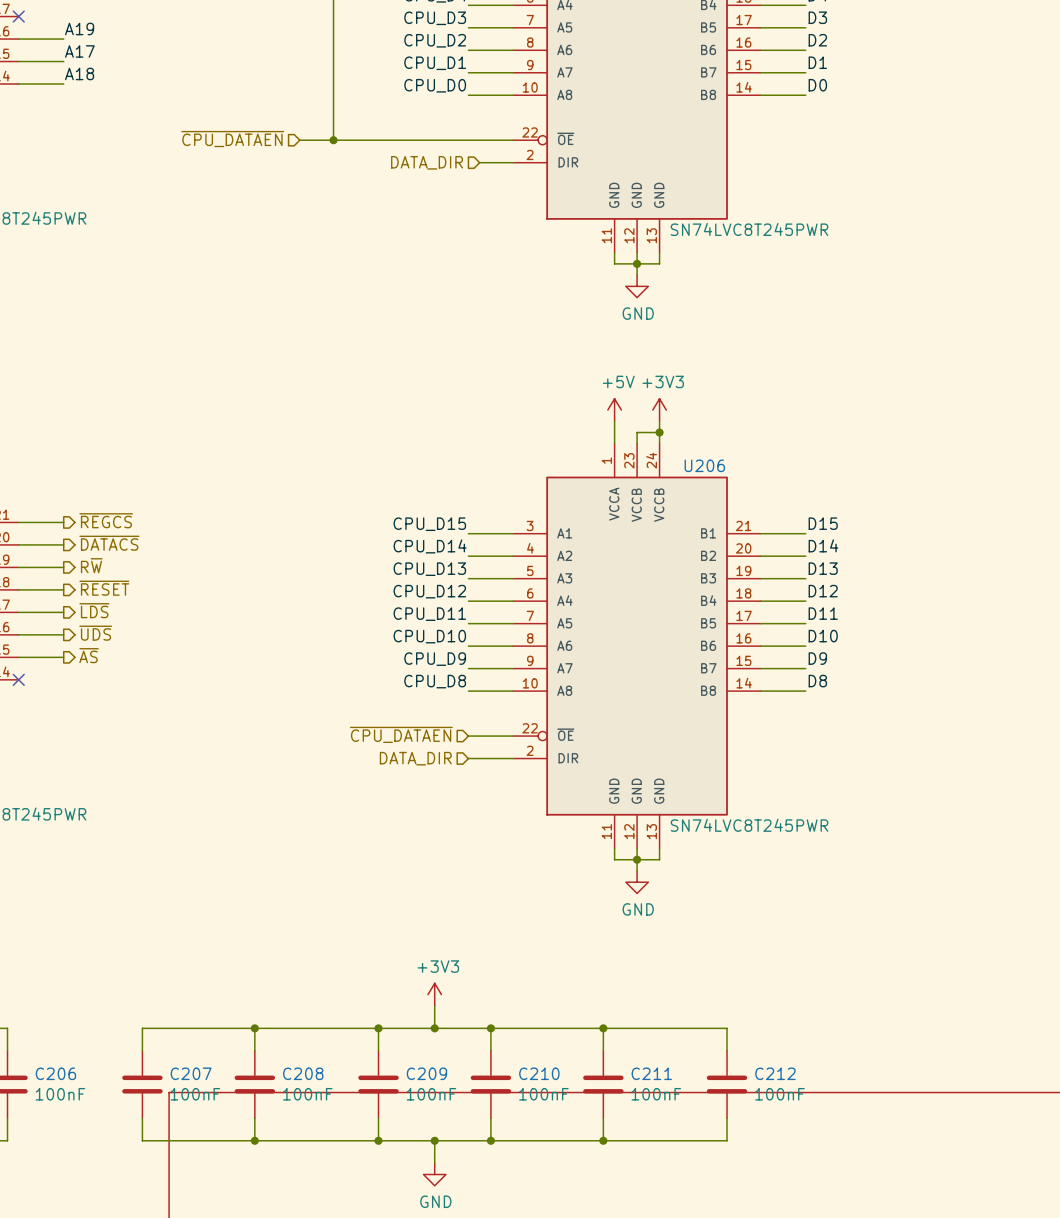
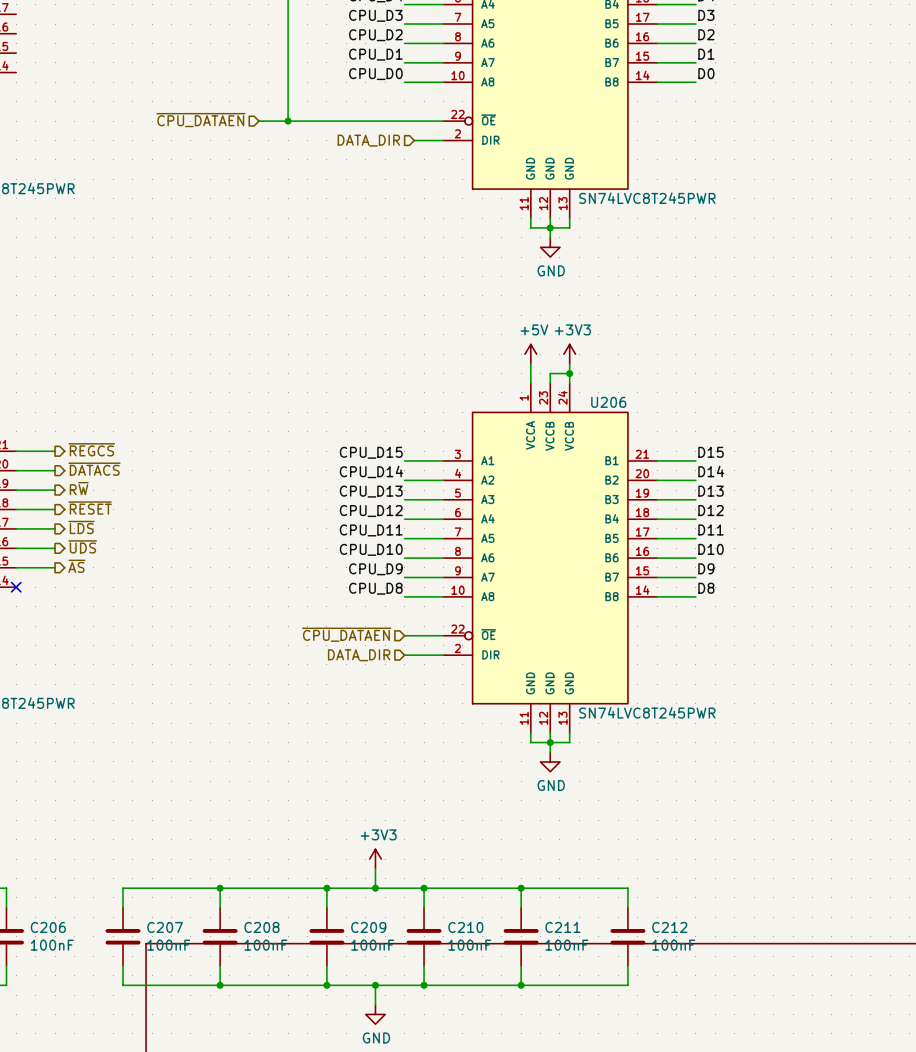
no-connect mark: (18, 16) -> none
label: A19 (79, 29) -> none
wire: (18, 39) (63, 39) -> none
label: A17 (79, 51) -> none
wire: (18, 61) (63, 61) -> none
label: A18 (79, 73) -> none
wire: (18, 84) (63, 84) -> none

